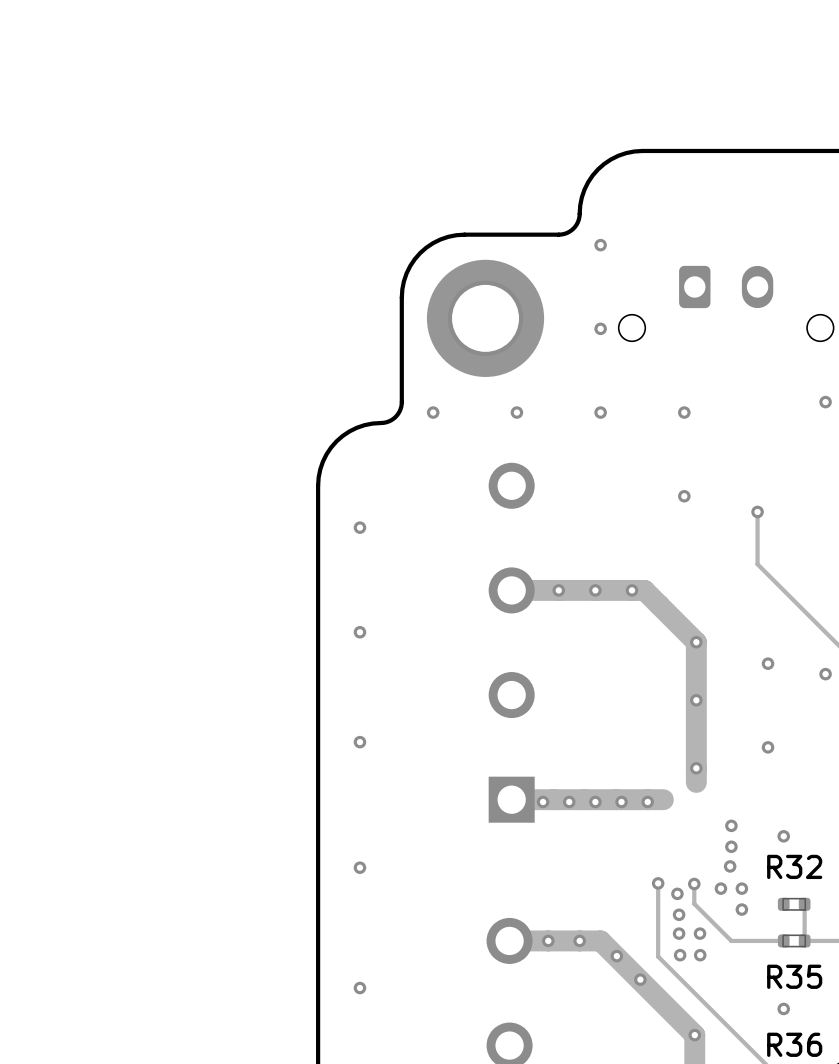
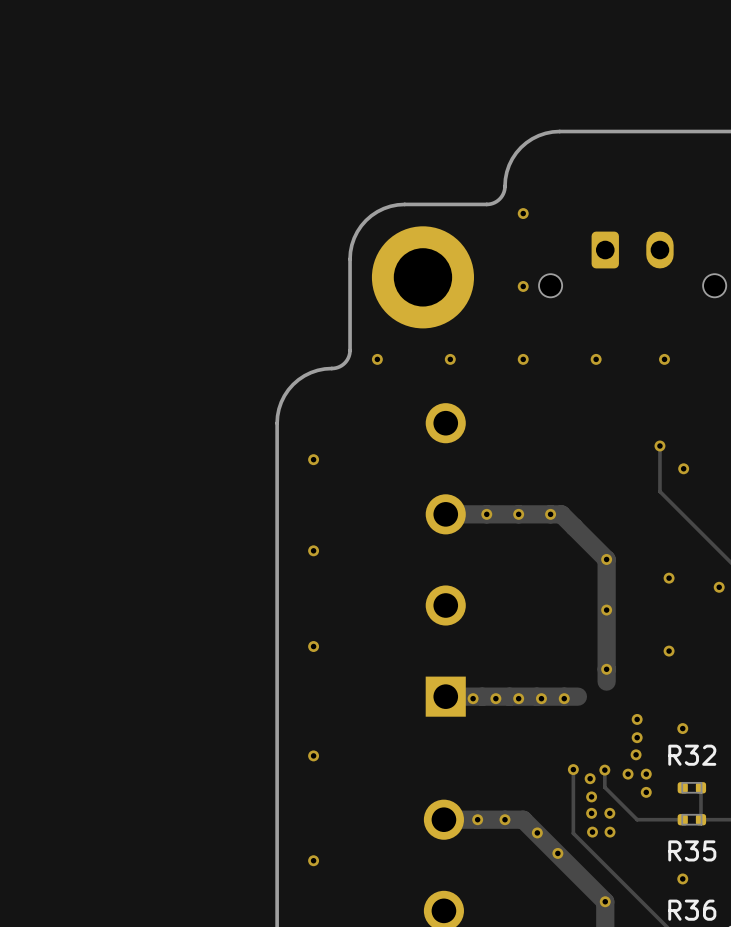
via: (825, 402) -> none
via: none -> (664, 359)
via: (684, 496) -> none
via: none -> (683, 468)

